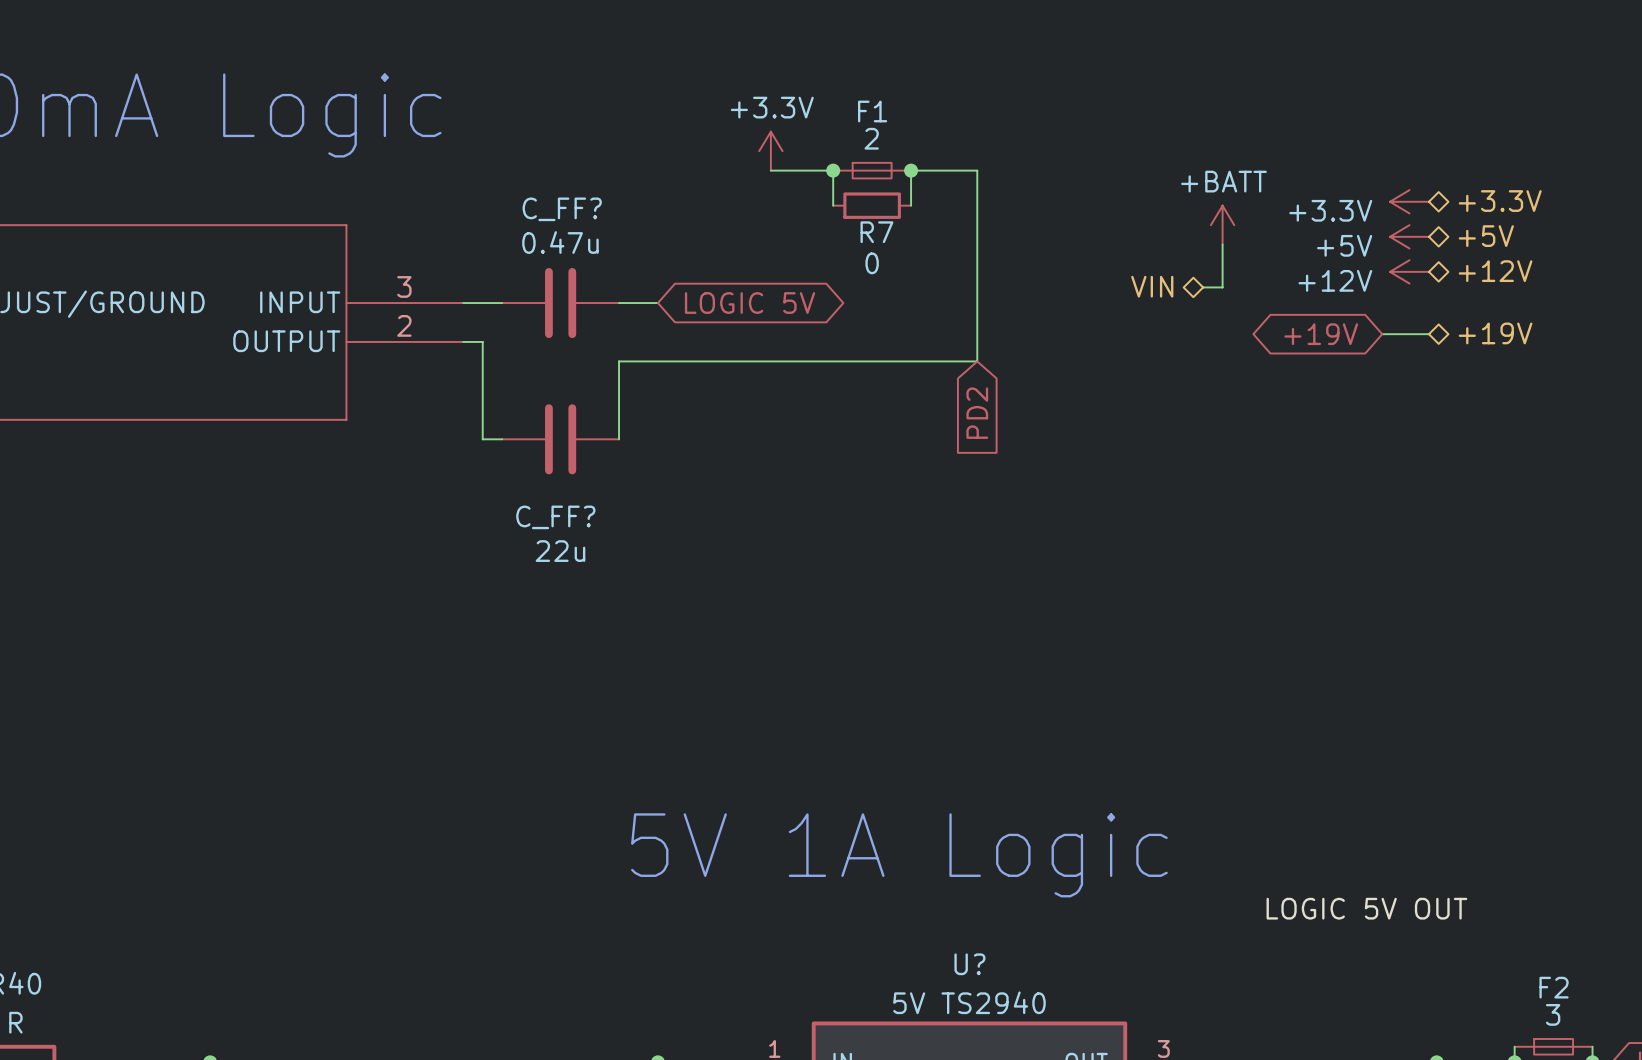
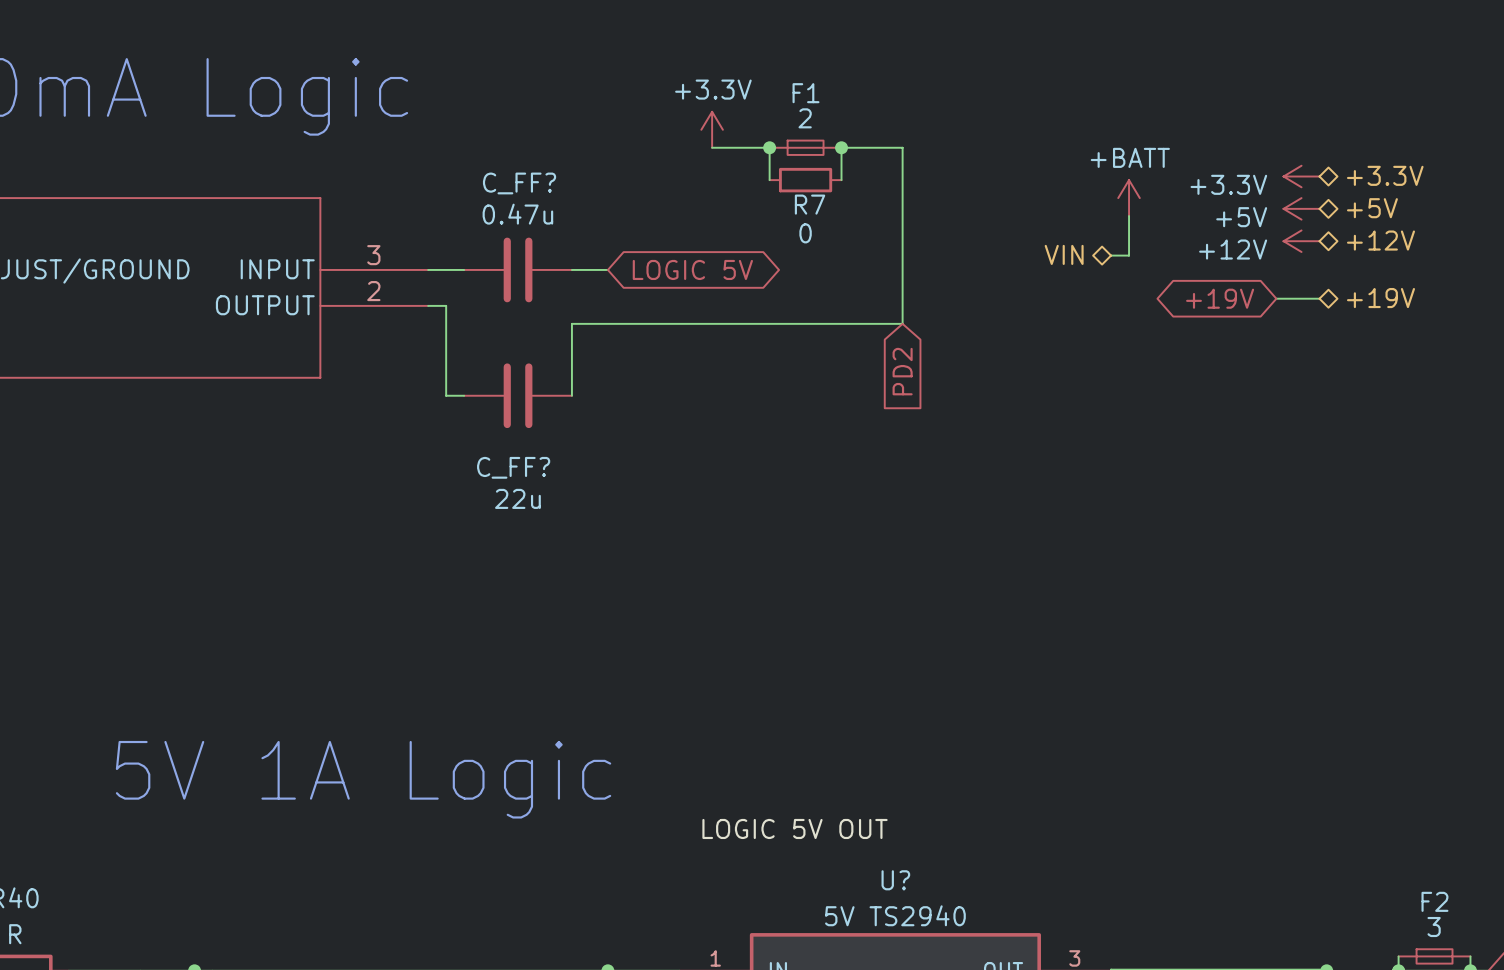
text: none -> 5V 1A Logic (363, 779)
text: 5V 1A Logic (899, 855) -> none
label: none -> LOGIC 5V OUT (795, 828)
label: LOGIC 5V OUT (1366, 908) -> none

